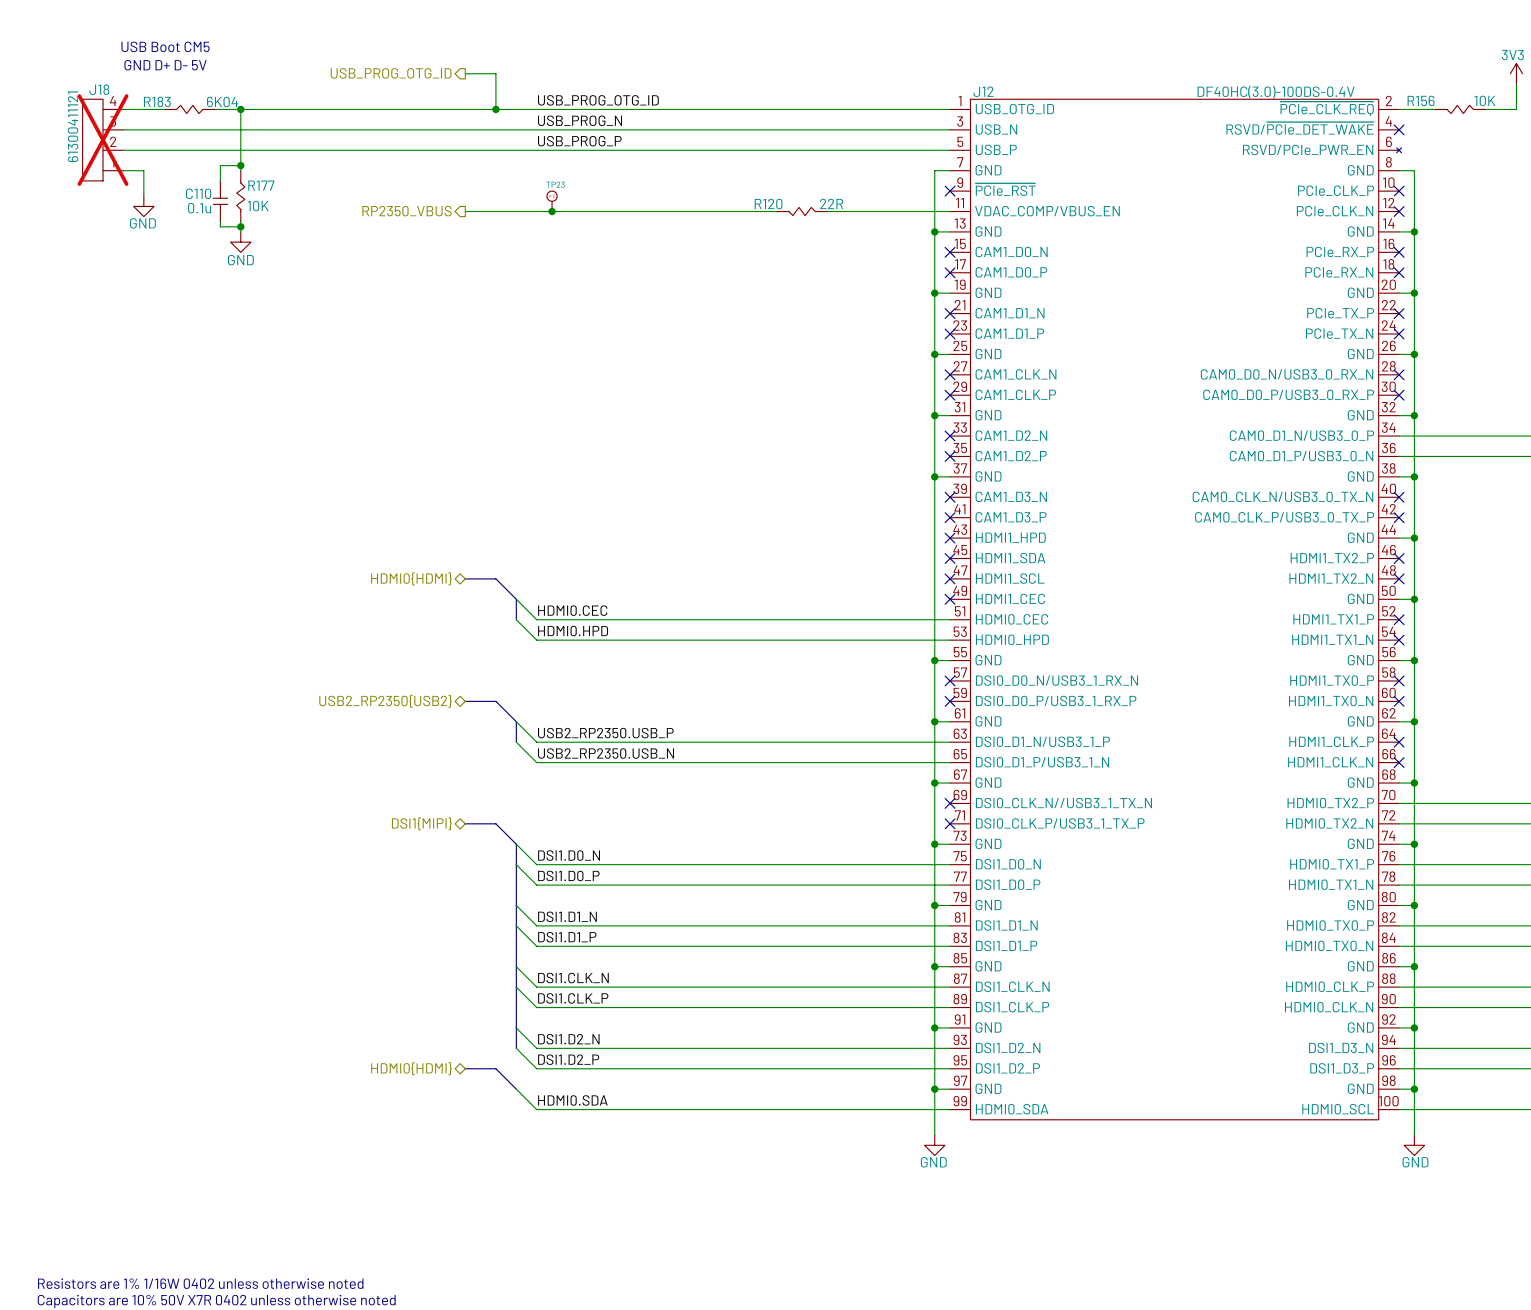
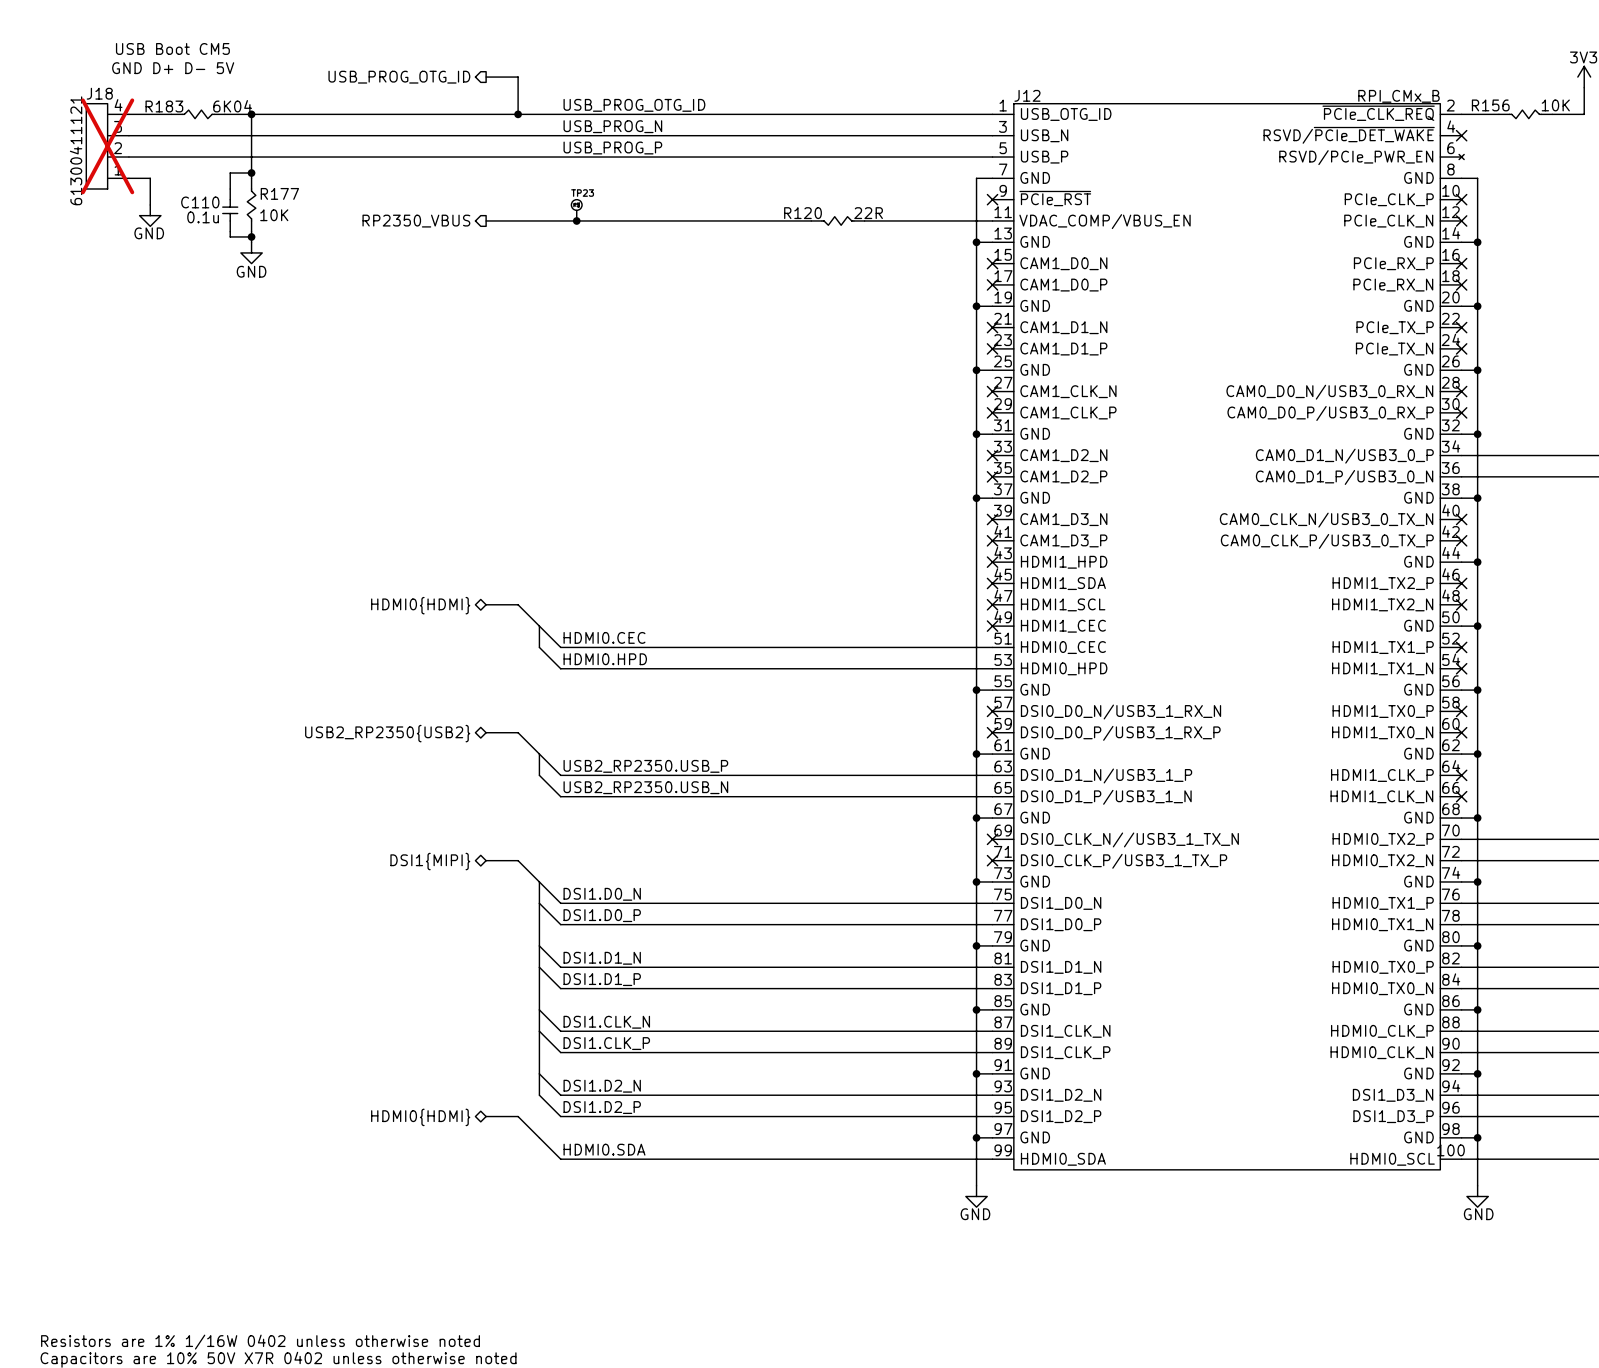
J12 value: DF40HC(3.0)-100DS-0.4V (1276, 92) -> RPI_CMx_B (1398, 96)

